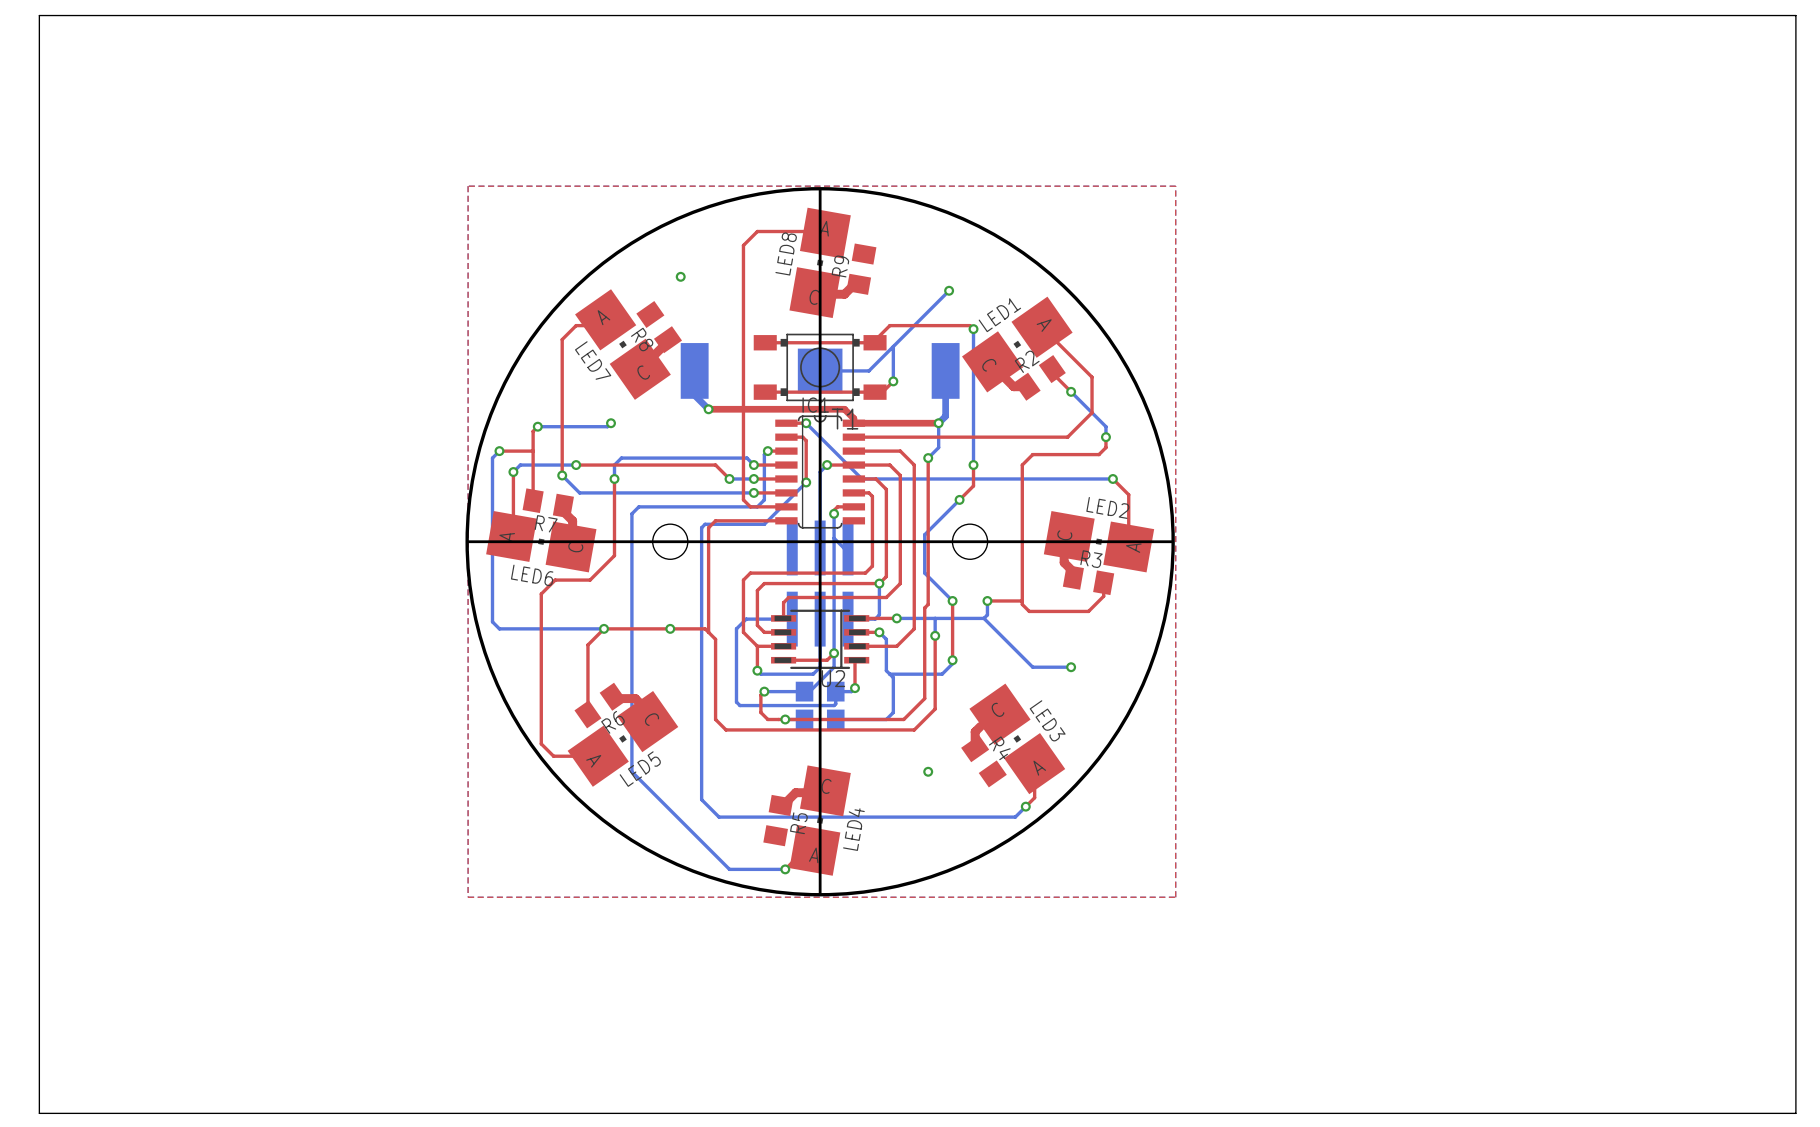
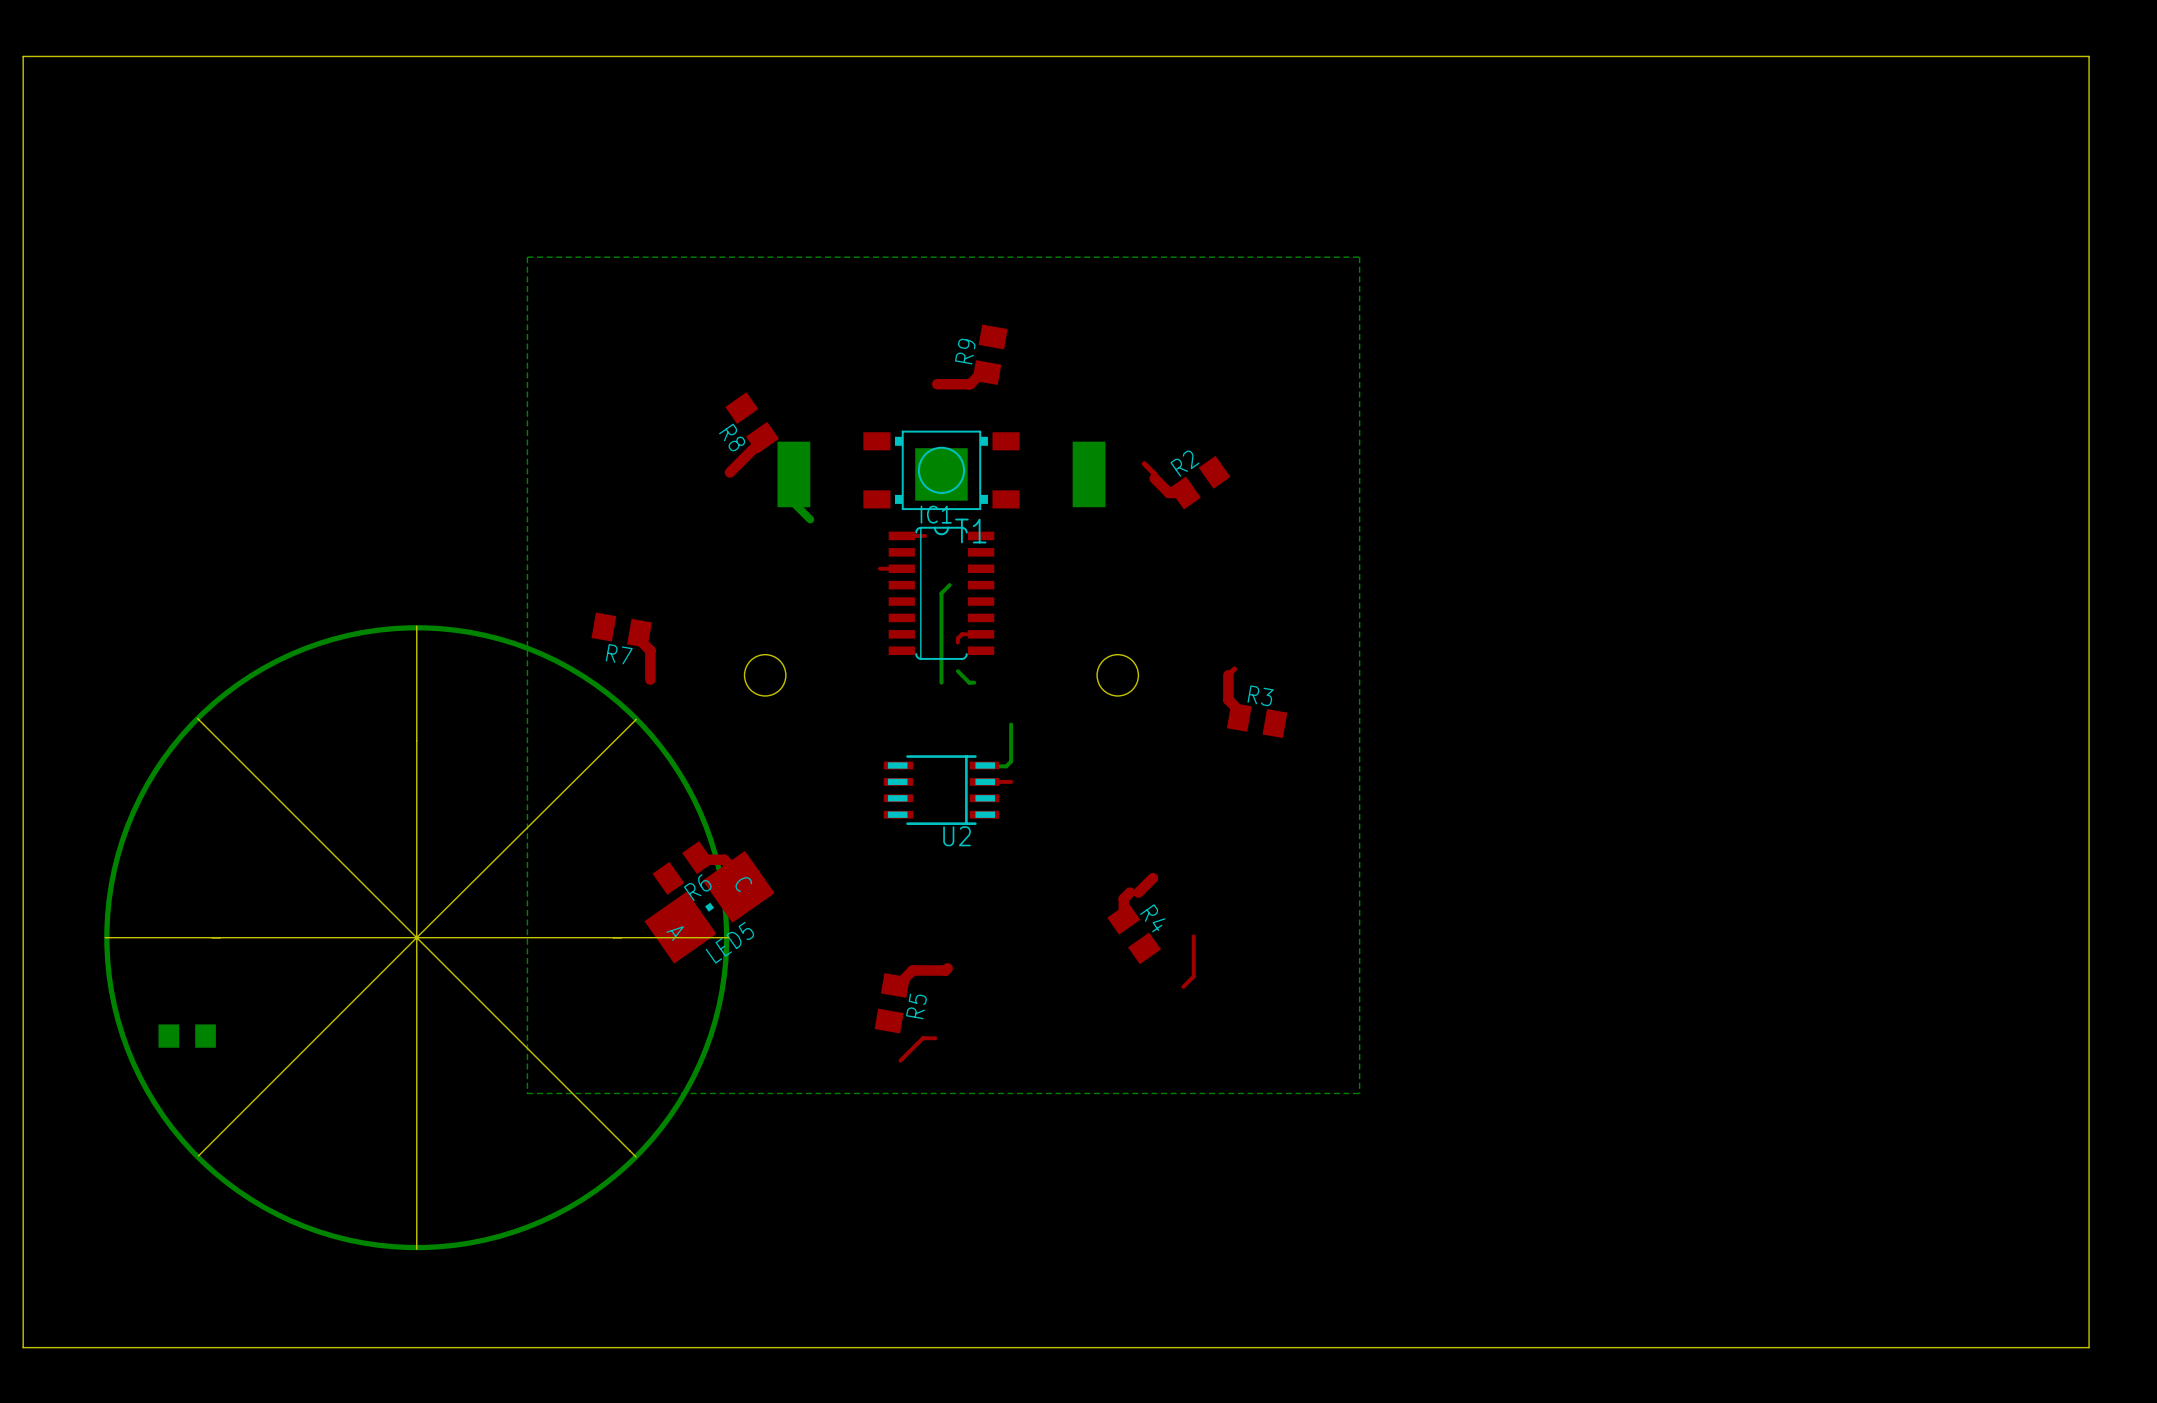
top zone outline: (468, 186) (1175, 186) (1175, 897) (468, 897) (468, 186) -> none
round board edge: [465, 187, 1175, 897] -> none
board edge: (820, 189) (820, 893) -> none
top track: (825, 233) (823, 231) (757, 231) (743, 245) (743, 499) (750, 506) (786, 506) -> none
LED8: (820, 262) -> none
via: (680, 276) -> none
bottom track: (949, 290) (868, 370) (820, 370) -> none
via: (949, 290) -> none
top track: (605, 319) (599, 325) (576, 325) (562, 339) (562, 475) -> none
top track: (1062, 327) (1042, 327) (1092, 377) (1092, 412) (1067, 437) (853, 437) -> none
top track: (973, 329) (970, 325) (889, 325) (875, 340) -> none
bottom track: (973, 329) (973, 465) -> none
via: (973, 329) -> none
top track: (765, 342) (875, 342) -> none
LED7: (622, 344) -> none
LED1: (1017, 344) -> none
bottom track: (893, 346) (893, 381) -> none
top track: (1052, 369) (1052, 373) (1071, 391) -> none
bottom track: (945, 370) (945, 416) (938, 423) (938, 447) (928, 458) -> none
top track: (893, 381) (882, 392) (765, 392) -> none
via: (893, 381) -> none
bottom track: (1071, 391) (1105, 426) (1105, 437) -> none
via: (1071, 391) -> none
top track: (708, 409) (844, 409) (853, 418) (853, 423) (938, 423) -> none
via: (708, 409) -> none
bottom track: (611, 423) (607, 426) (537, 426) -> none
via: (611, 423) -> none
bottom track: (806, 423) (861, 478) (1112, 478) -> none
via: (806, 423) -> none
via: (938, 423) -> none
top track: (537, 426) (533, 431) (533, 500) -> none
via: (537, 426) -> none
top track: (786, 437) (802, 437) (806, 440) (806, 482) -> none
top track: (1105, 437) (1105, 447) (1099, 454) (1032, 454) (1022, 465) (1022, 604) (1029, 611) (1088, 611) (1103, 596) (1103, 582) -> none
via: (1105, 437) -> none
top track: (499, 451) (533, 451) -> none
bottom track: (499, 451) (492, 458) (492, 621) (499, 628) (604, 628) -> none
via: (499, 451) -> none
bottom track: (767, 451) (764, 454) (764, 499) (757, 506) (638, 506) (631, 513) (631, 771) (729, 869) (785, 869) -> none
via: (767, 451) -> none
top track: (853, 451) (900, 451) (914, 465) (914, 628) (896, 646) (856, 646) -> none
top track: (928, 458) (928, 604) (924, 607) (924, 698) (903, 719) (767, 719) (760, 712) (760, 695) (764, 691) -> none
via: (928, 458) -> none
top track: (576, 465) (715, 465) (729, 478) -> none
bottom track: (576, 465) (520, 465) (513, 472) -> none
via: (576, 465) -> none
top track: (753, 465) (786, 465) -> none
bottom track: (753, 465) (746, 458) (621, 458) (614, 465) (614, 478) -> none
via: (753, 465) -> none
top track: (827, 465) (889, 465) (900, 475) (900, 583) (886, 597) (788, 597) (783, 602) (783, 618) -> none
via: (827, 465) -> none
top track: (973, 465) (973, 485) (959, 499) -> none
via: (973, 465) -> none
top track: (513, 472) (513, 534) (511, 536) -> none
via: (513, 472) -> none
bottom track: (562, 475) (579, 492) (753, 492) -> none
via: (562, 475) -> none
top track: (614, 478) (614, 555) (590, 580) (555, 580) (541, 594) (541, 743) (553, 756) (598, 756) -> none
via: (614, 478) -> none
bottom track: (729, 478) (753, 478) -> none
via: (729, 478) -> none
top track: (753, 478) (786, 478) -> none
via: (753, 478) -> none
top track: (853, 478) (875, 478) (886, 489) (886, 576) (879, 583) (764, 583) (757, 590) (757, 625) (764, 632) (783, 632) -> none
top track: (1112, 478) (1128, 494) (1128, 546) (1137, 538) -> none
via: (1112, 478) -> none
bottom track: (806, 482) (764, 524) (705, 524) (701, 527) (701, 799) (719, 817) (1015, 817) (1025, 806) -> none
via: (806, 482) -> none
top track: (753, 492) (786, 492) -> none
via: (753, 492) -> none
top track: (853, 492) (868, 492) (872, 496) (872, 566) (865, 573) (750, 573) (743, 580) (743, 632) (757, 646) -> none
drawing: none -> [104, 625, 730, 1251]
board edge: none -> (416, 626) (416, 1249)
bottom track: (959, 499) (924, 534) (924, 573) (952, 600) -> none
via: (959, 499) -> none
bottom track: (834, 513) (834, 667) (809, 691) (764, 691) -> none
via: (834, 513) -> none
top track: (786, 520) (715, 520) (708, 527) (708, 632) -> none
board edge: (468, 541) (1172, 541) -> none
LED6: (541, 541) -> none
LED2: (1099, 541) -> none
board edge: none -> (197, 718) (635, 1156)
board edge: none -> (636, 719) (198, 1156)
part: (820, 583) -> none
via: (879, 583) -> none
top track: (952, 600) (952, 660) -> none
via: (952, 600) -> none
top track: (987, 600) (1022, 600) -> none
bottom track: (987, 600) (987, 614) (983, 618) -> none
via: (987, 600) -> none
top track: (856, 618) (896, 618) -> none
bottom track: (896, 618) (983, 618) -> none
via: (896, 618) -> none
bottom track: (935, 618) (935, 635) -> none
bottom track: (983, 618) (1032, 667) (1071, 667) -> none
bottom track: (792, 619) (746, 619) (736, 628) (736, 702) (739, 705) (834, 705) (835, 691) (851, 691) (855, 688) -> none
bottom track: (820, 619) (820, 667) (813, 674) (760, 674) (757, 670) -> none
via: (604, 628) -> none
via: (670, 628) -> none
bottom track: (879, 632) (886, 639) (886, 670) (893, 677) (893, 712) (886, 719) (835, 719) -> none
via: (879, 632) -> none
top track: (935, 635) (935, 709) (914, 729) (726, 729) (715, 719) (715, 639) (705, 628) (604, 628) (587, 644) (587, 714) -> none
via: (935, 635) -> none
top track: (757, 646) (783, 646) -> none
top track: (757, 646) (757, 670) -> none
top track: (834, 653) (827, 660) (783, 660) -> none
via: (834, 653) -> none
top track: (856, 660) (855, 661) (855, 688) -> none
bottom track: (952, 660) (952, 663) (942, 674) (889, 674) -> none
via: (952, 660) -> none
via: (1071, 667) -> none
via: (757, 670) -> none
via: (855, 688) -> none
via: (764, 691) -> none
part: (820, 691) -> none
via: (785, 719) -> none
part: (820, 719) -> none
LED3: (1017, 738) -> none
board edge: none -> (105, 937) (728, 937)
via: (928, 771) -> none
via: (1025, 806) -> none
LED4: (820, 820) -> none
part: none -> (187, 1036)
via: (785, 869) -> none

